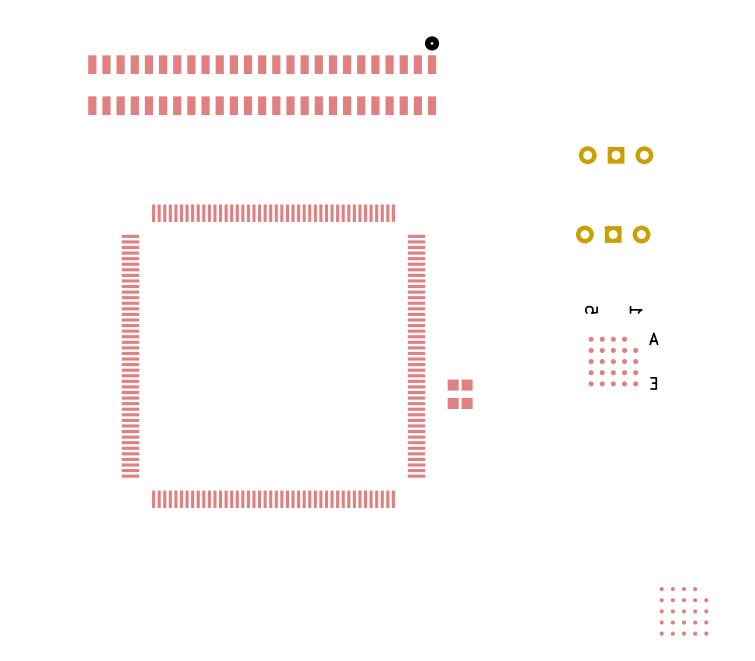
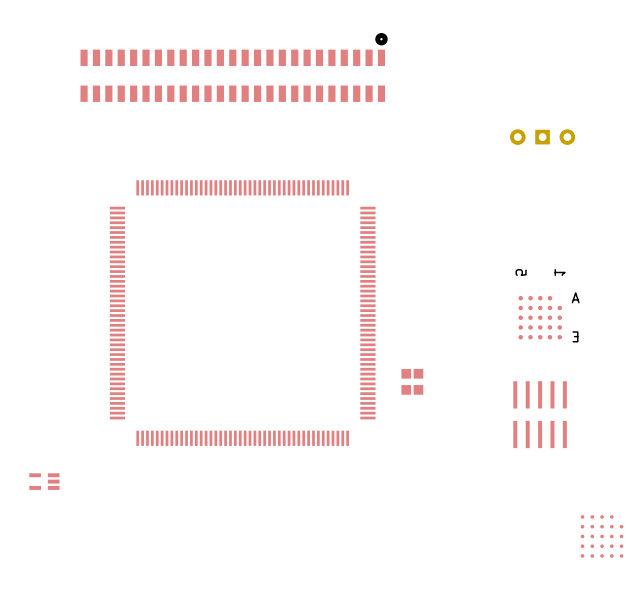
part: (613, 234) -> none
part position: (460, 394) -> (412, 381)
part: none -> (540, 414)
part: none -> (44, 481)

